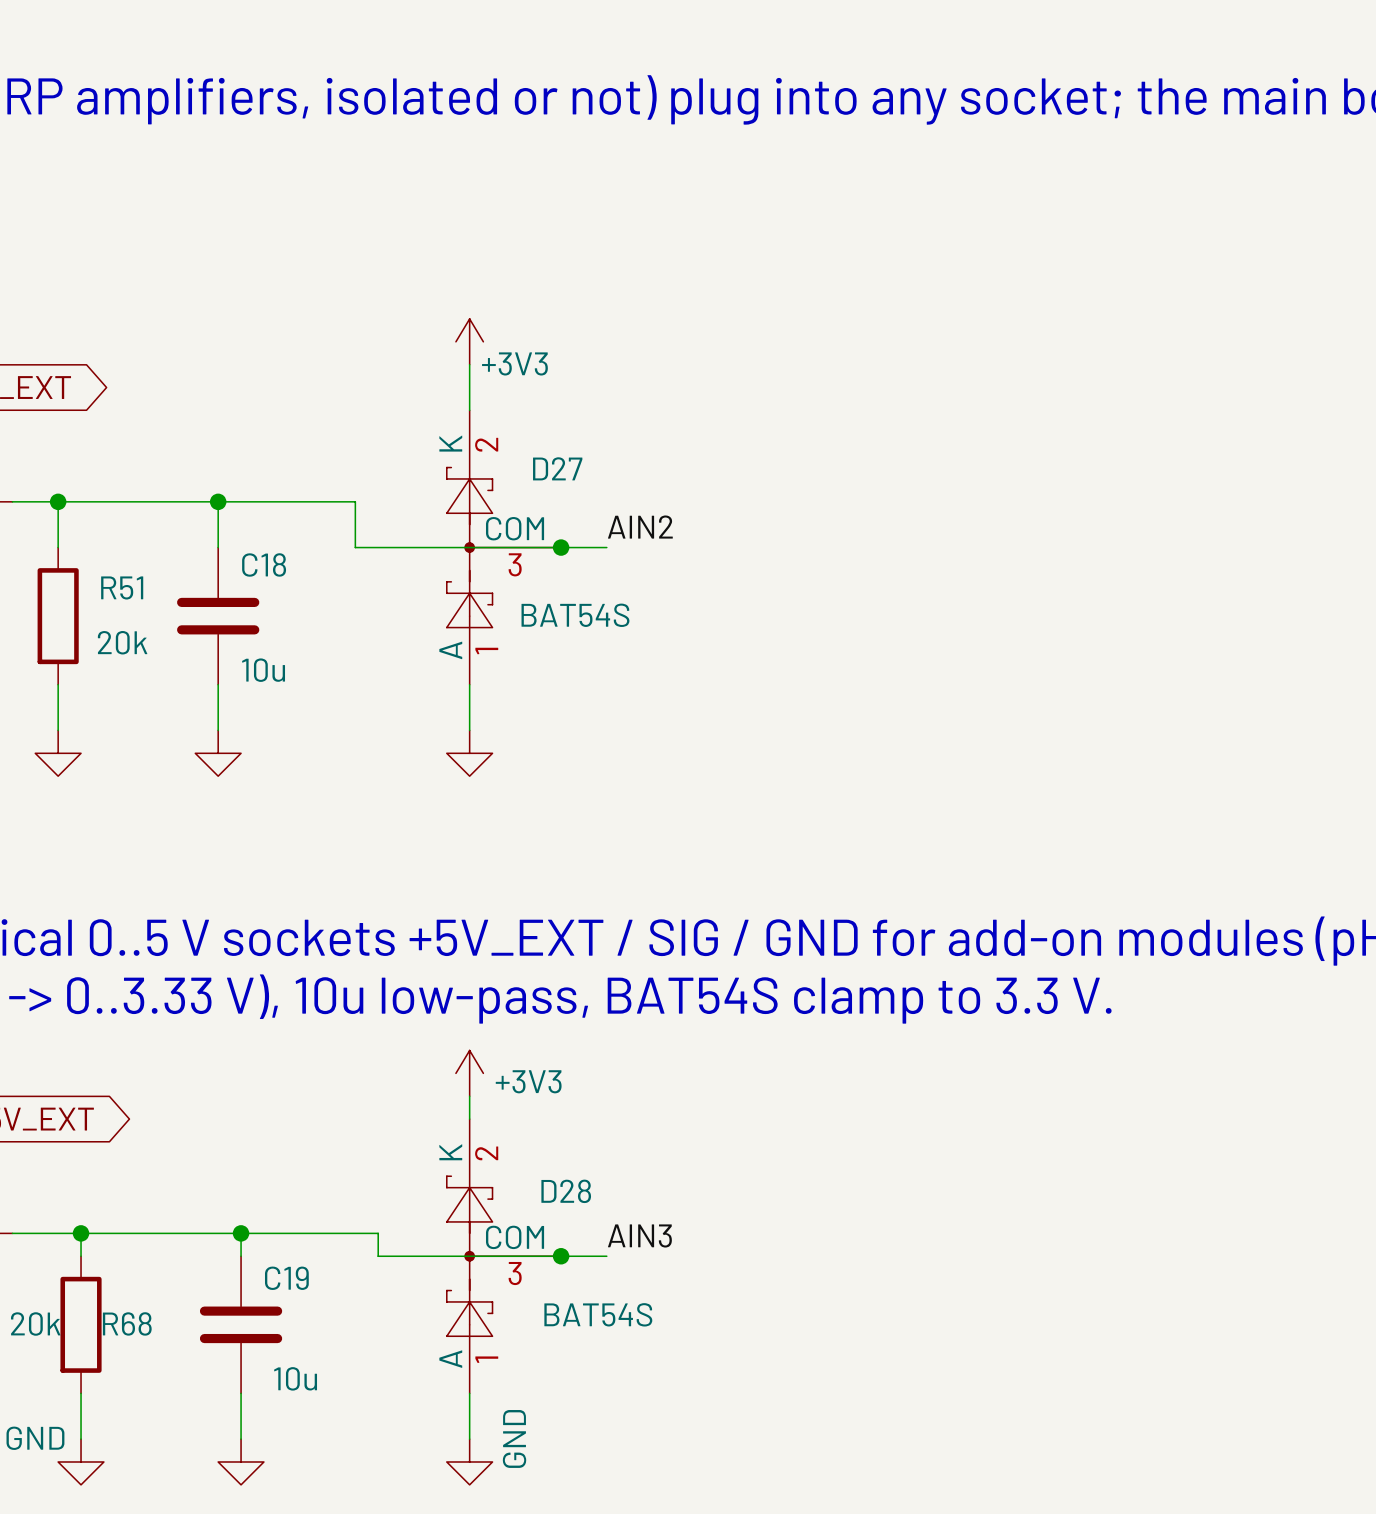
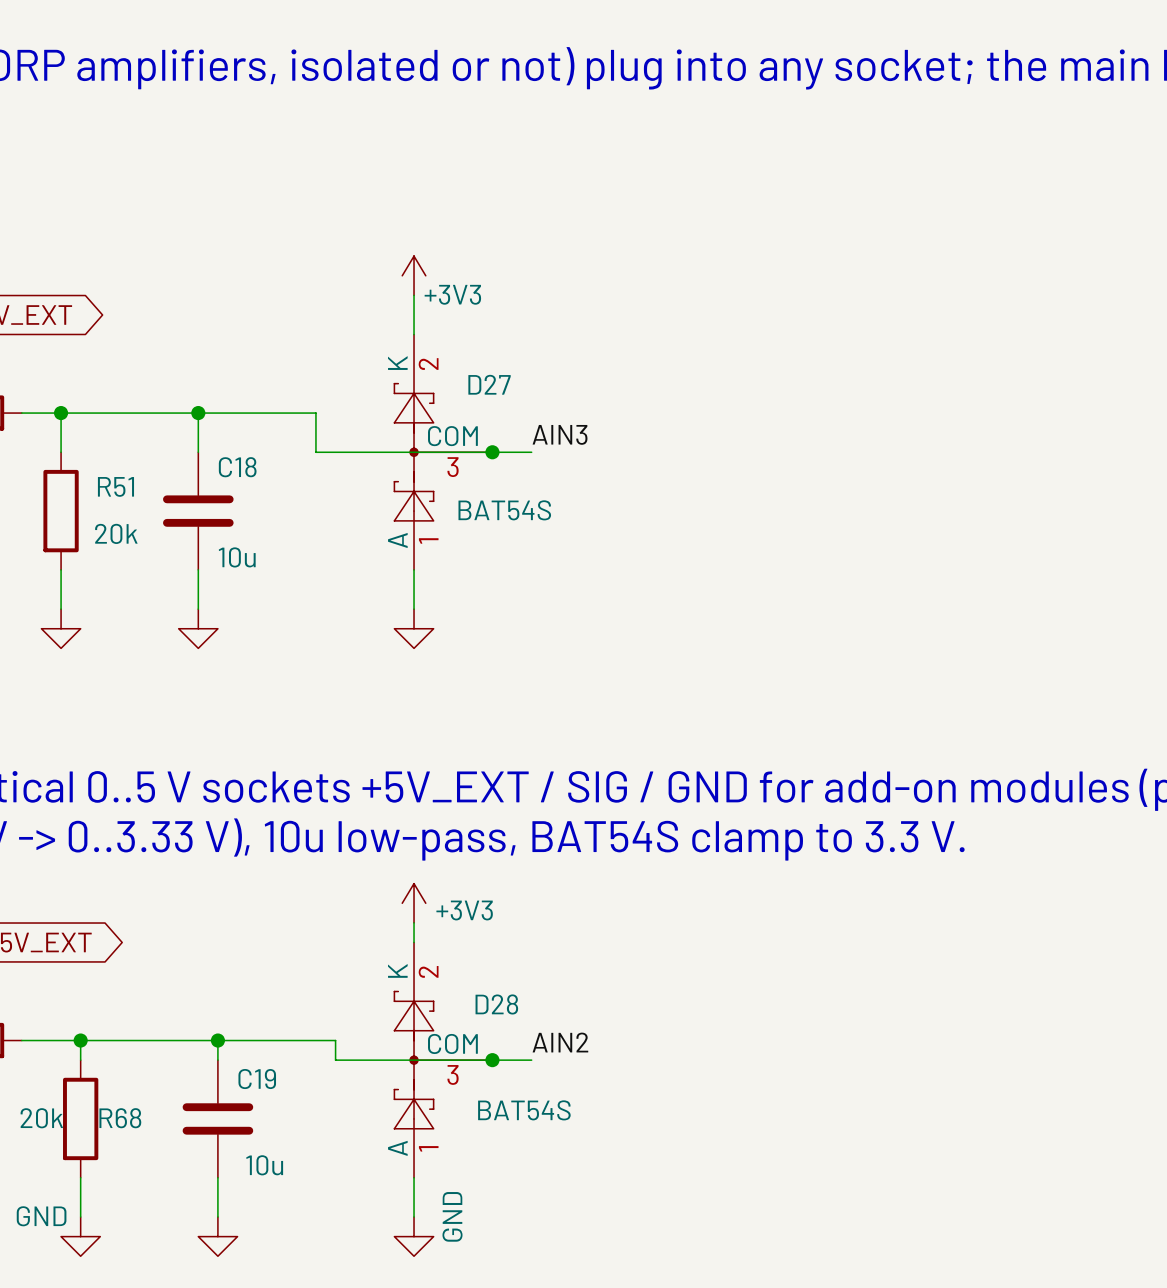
label: AIN2 (640, 527) -> AIN3 (560, 434)
label: AIN3 (639, 1235) -> AIN2 (560, 1042)

